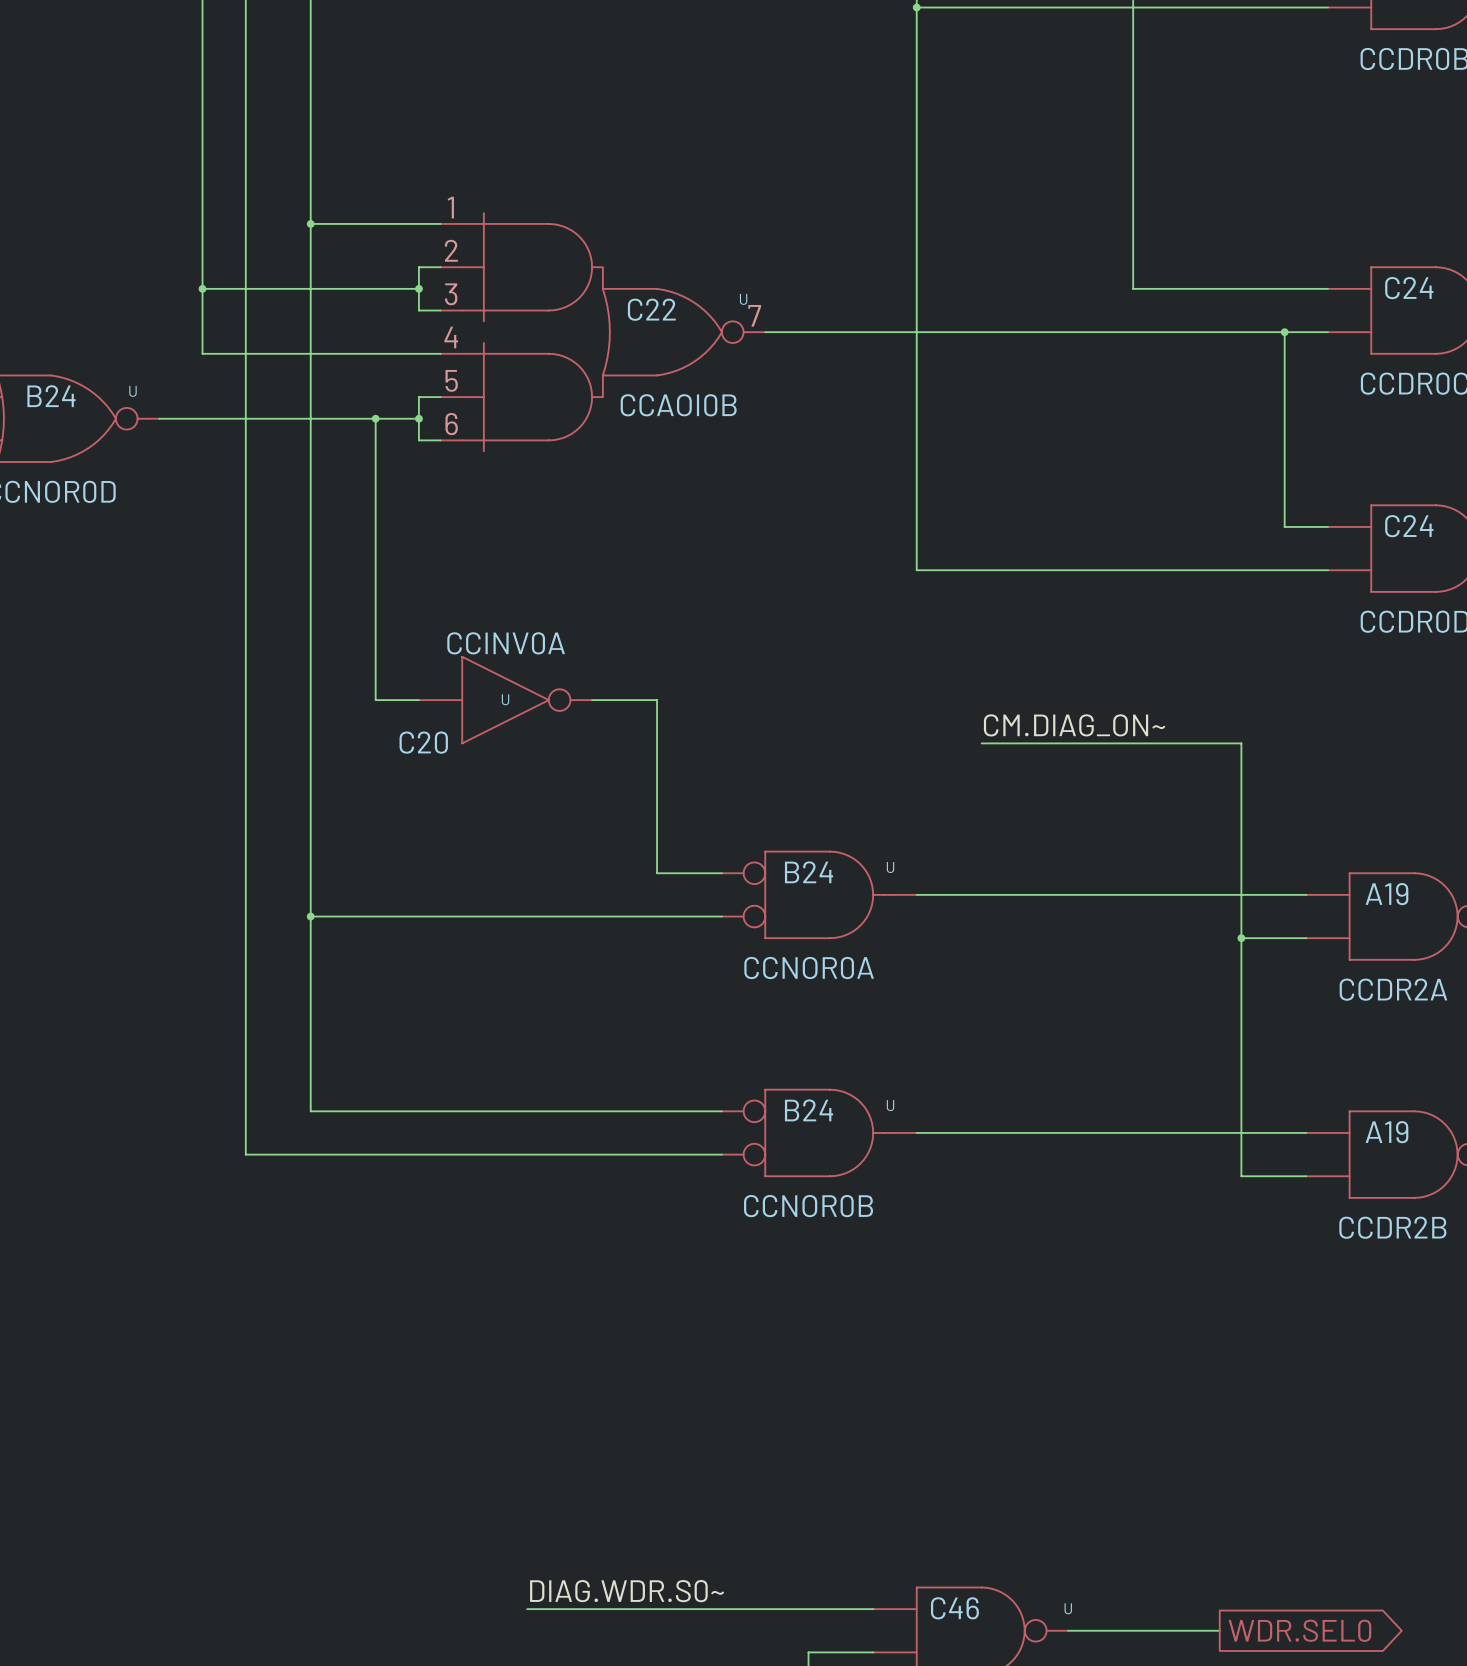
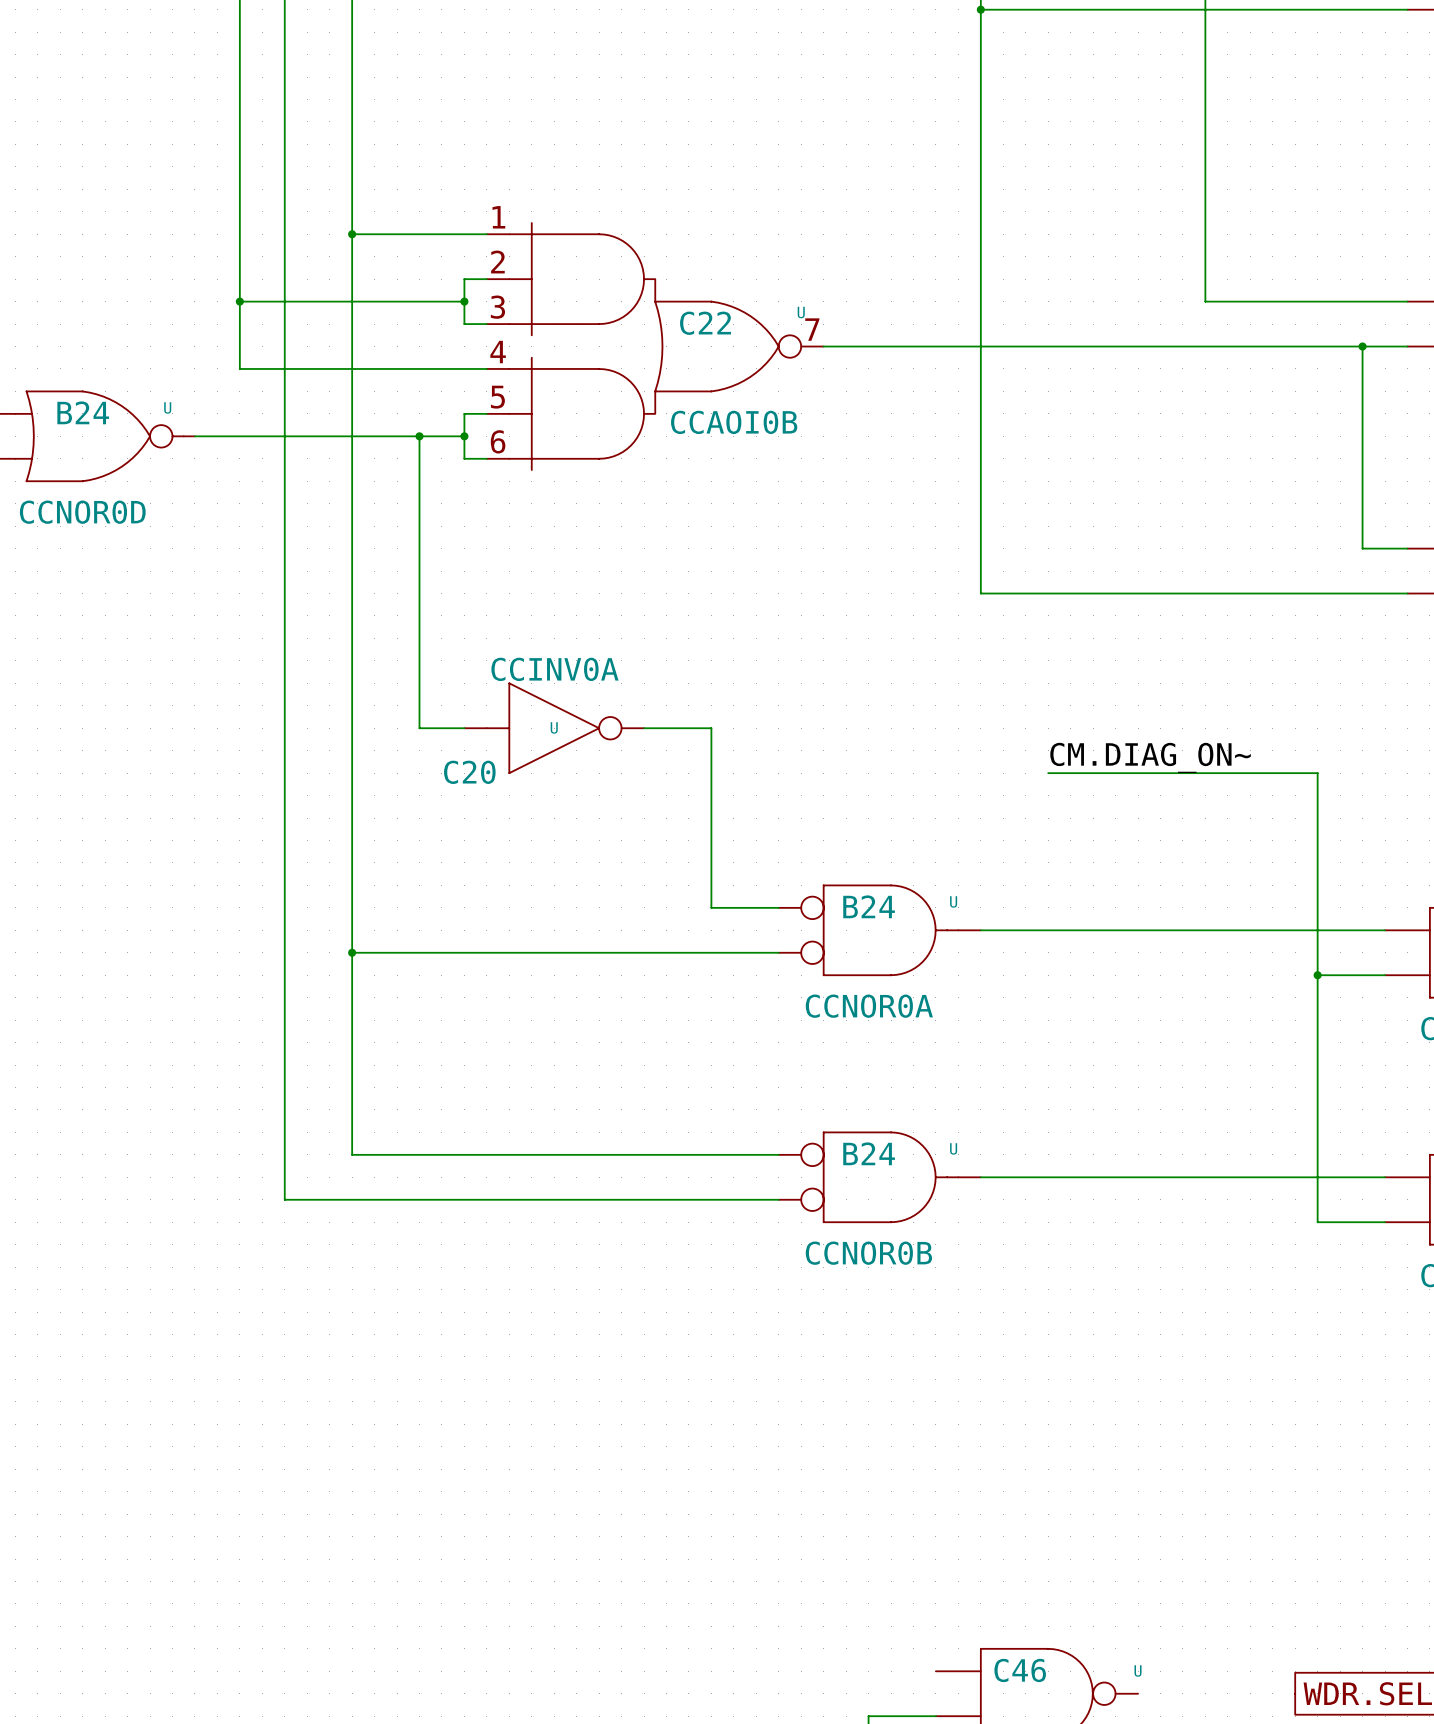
label: DIAG.WDR.S0~ (627, 1591) -> none
wire: (527, 1609) (873, 1609) -> none
wire: (1068, 1630) (1219, 1630) -> none

